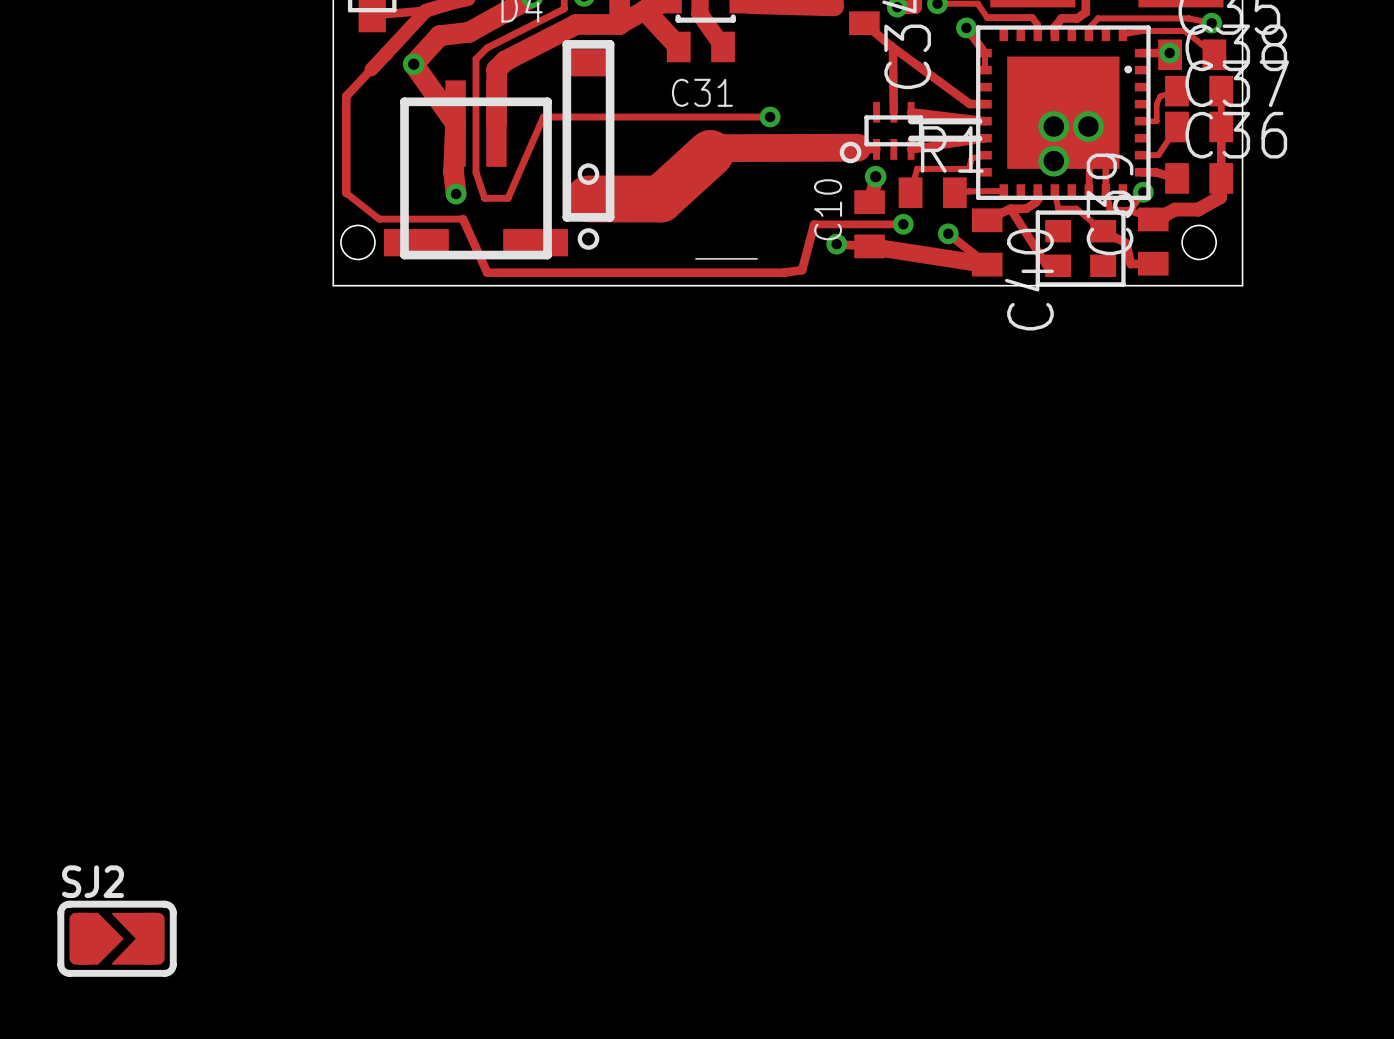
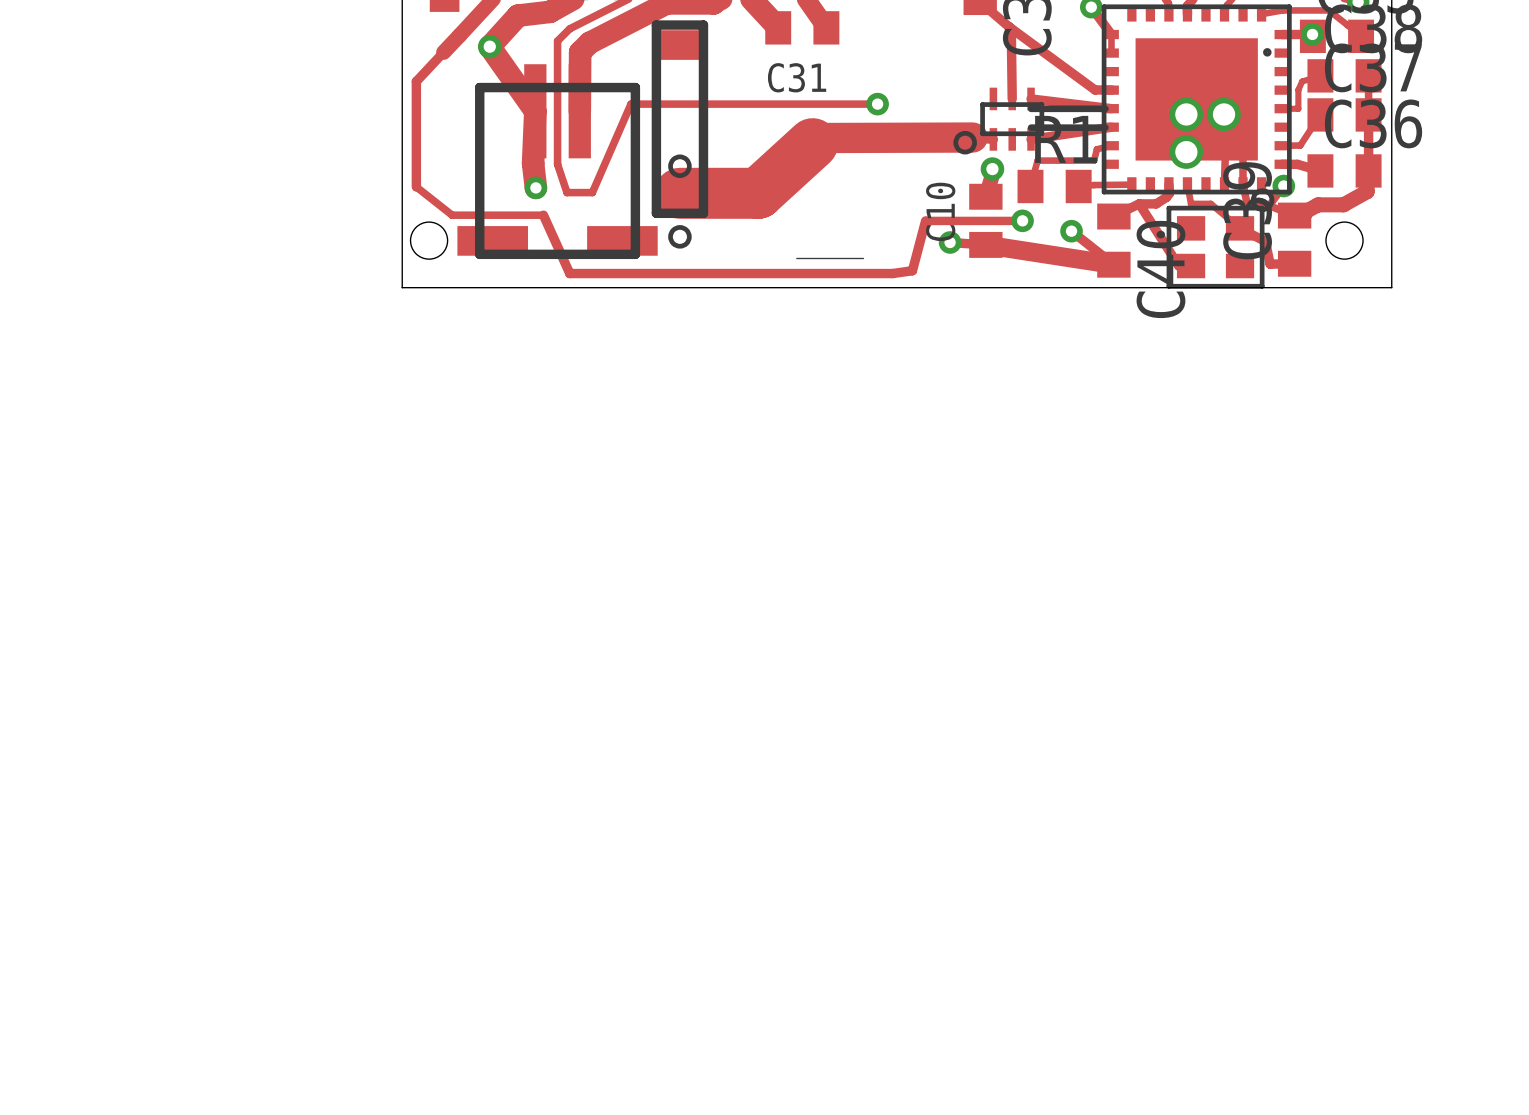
SJ2: (117, 938) -> none

